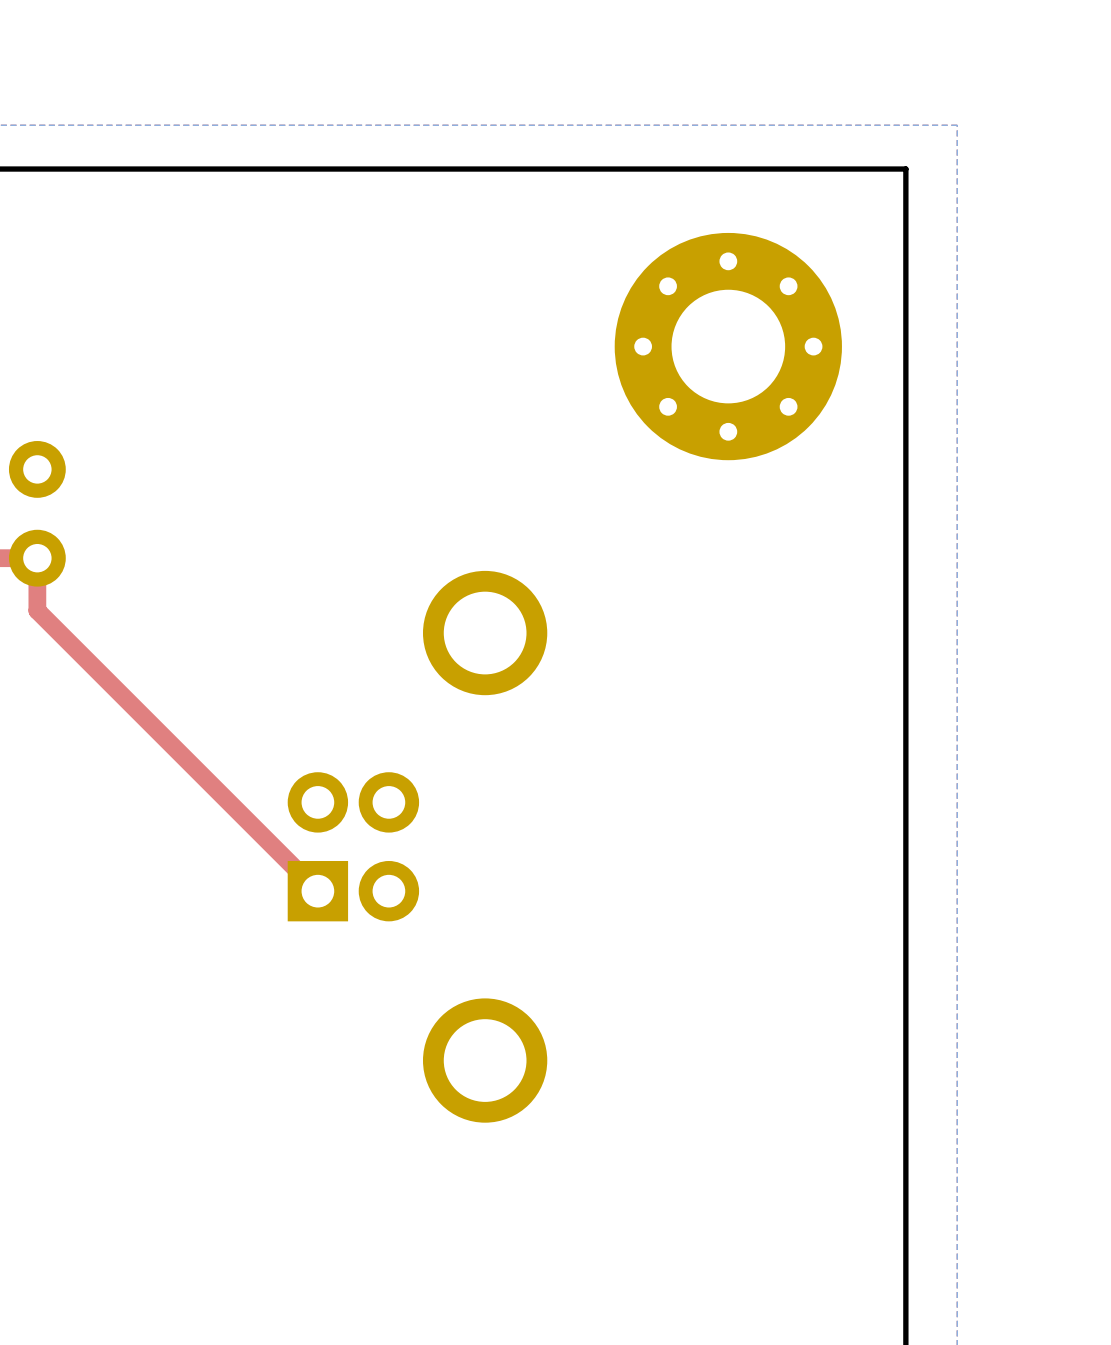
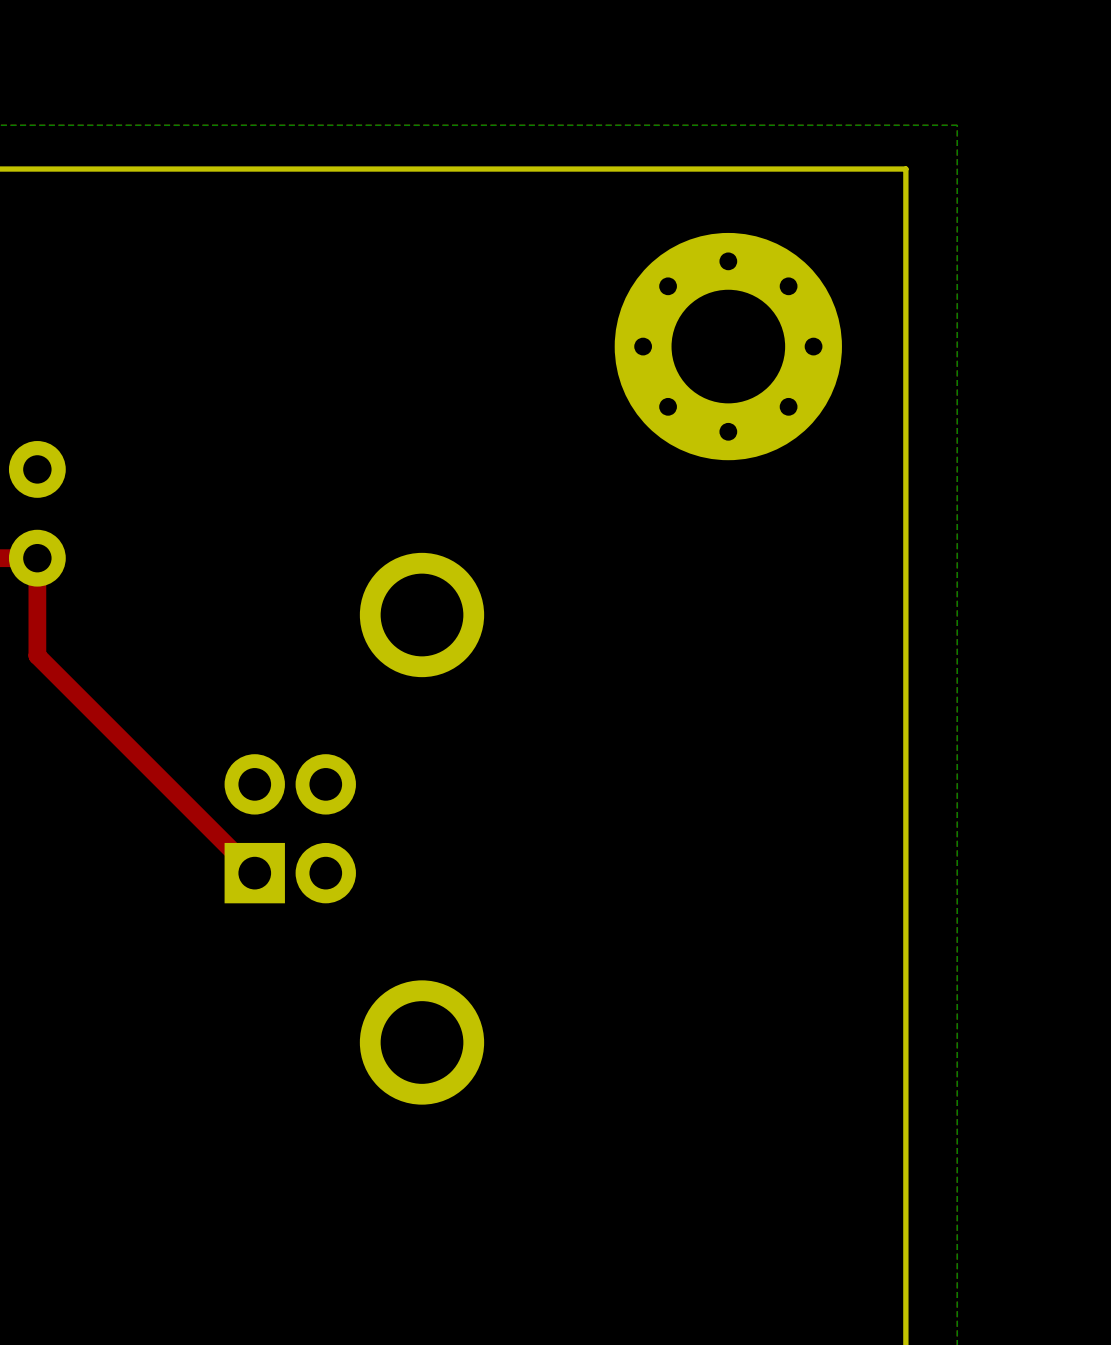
top track: (37, 610) (317, 891) -> (37, 610) (37, 655) (254, 873)
part position: (417, 846) -> (354, 828)

